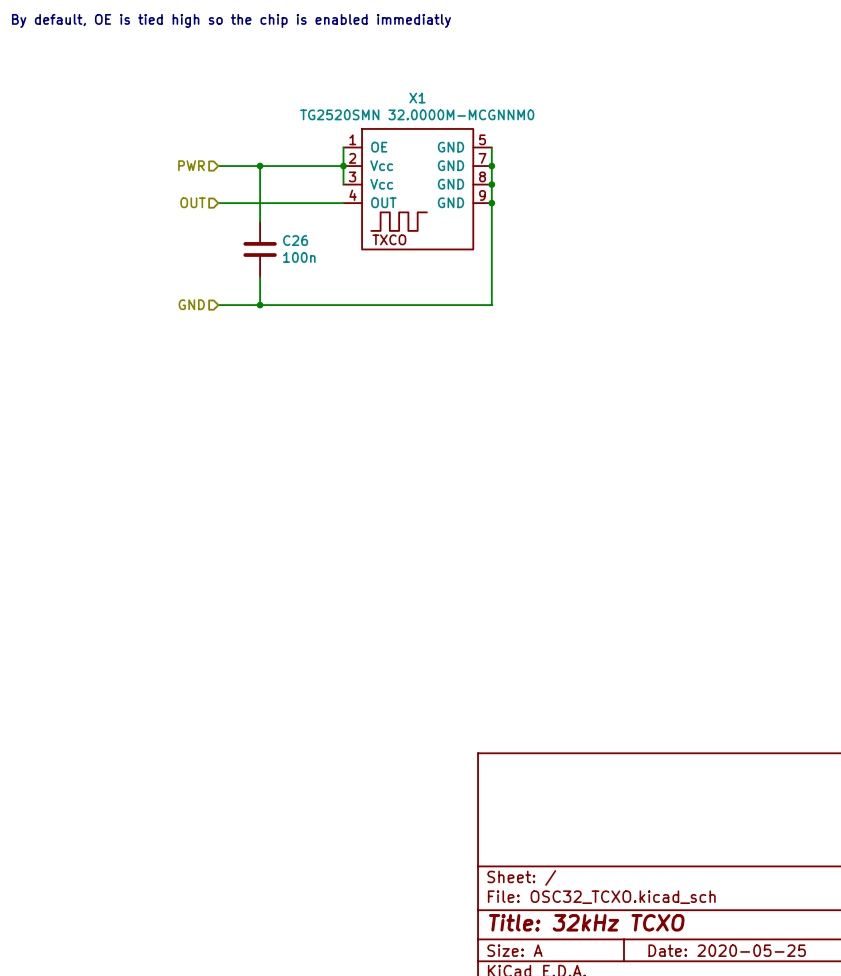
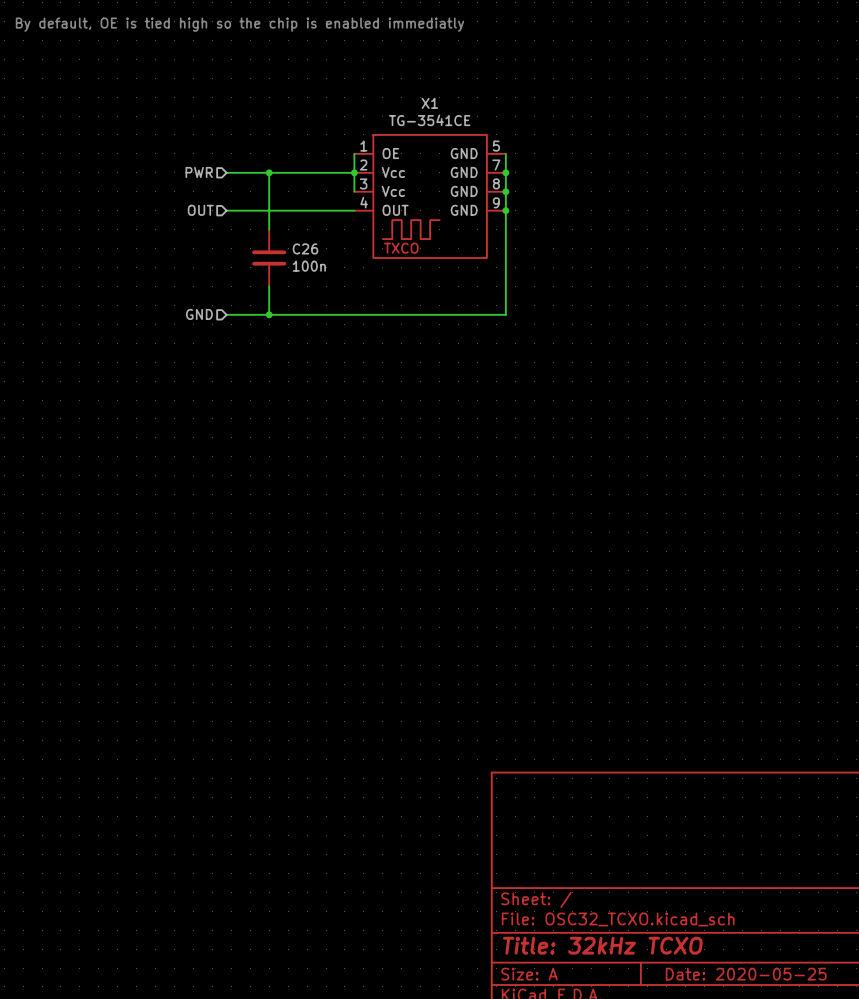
X1 value: TG2520SMN 32.0000M-MCGNNM0 (417, 114) -> TG-3541CE (429, 120)

